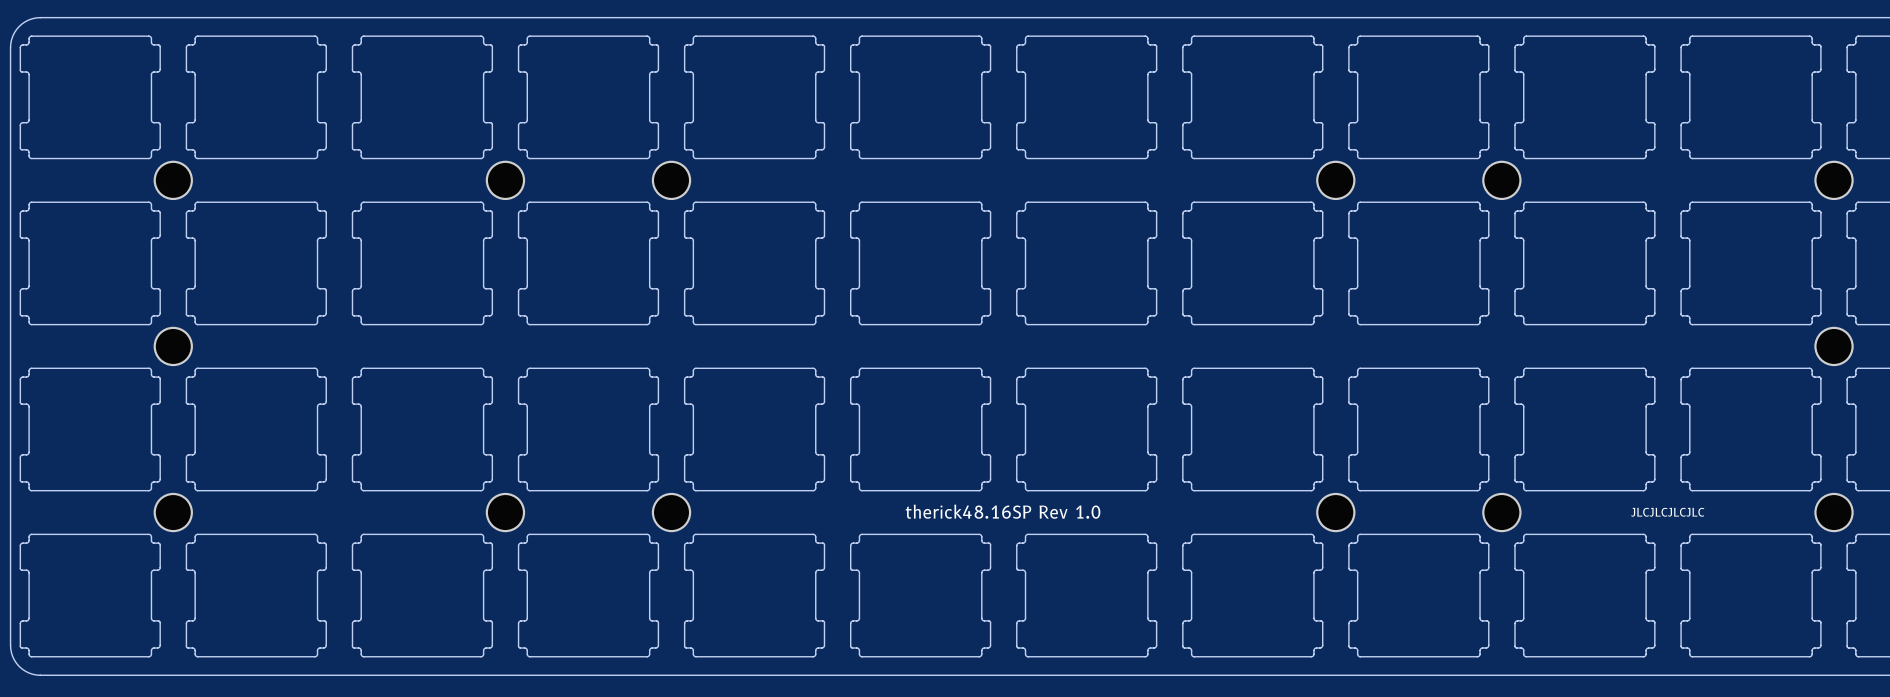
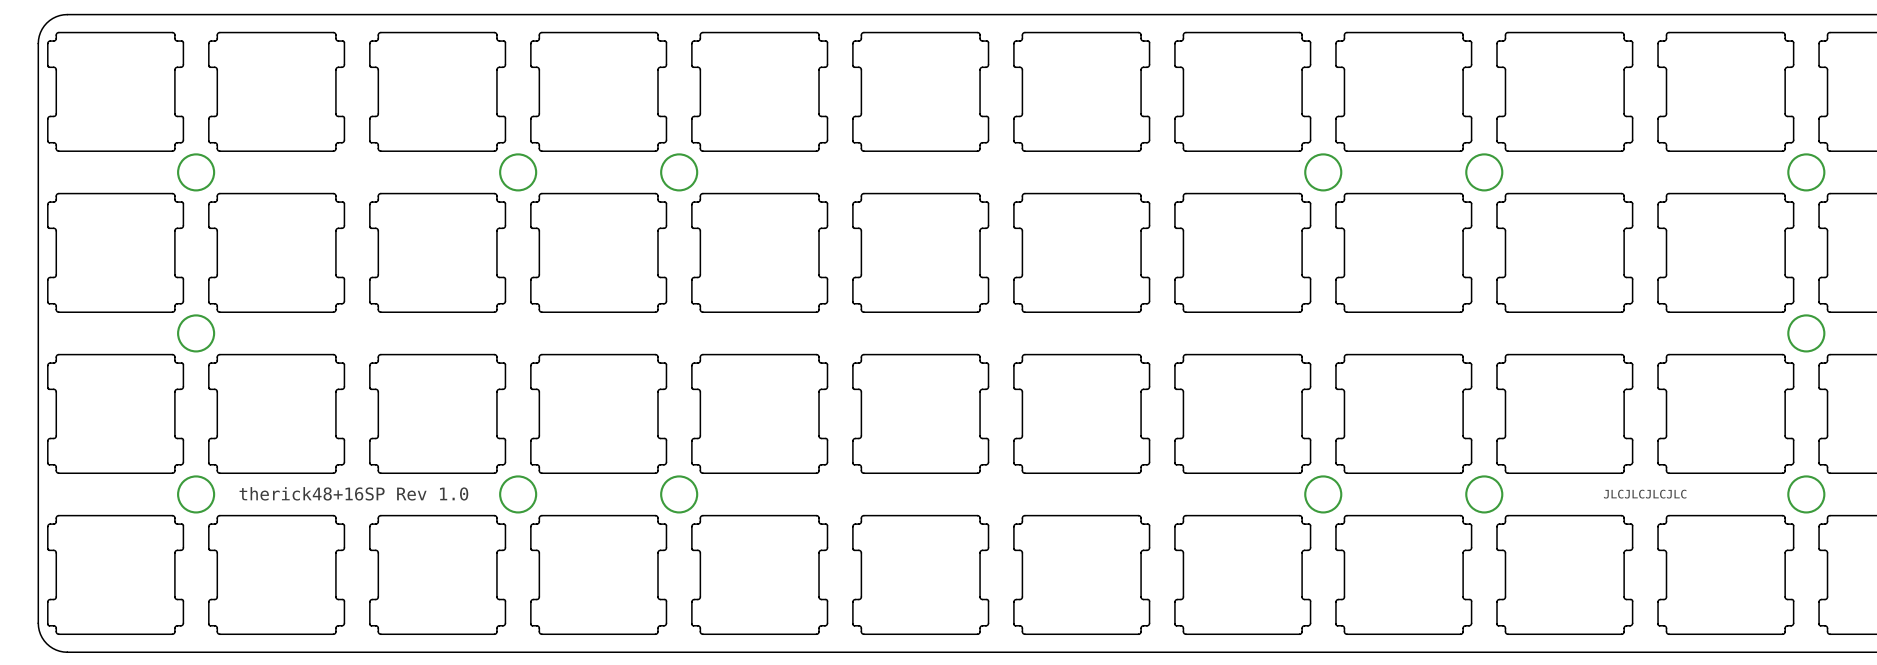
text: none -> therick48+16SP Rev 1.0 (353, 493)
text: therick48.16SP Rev 1.0 (1003, 511) -> none

